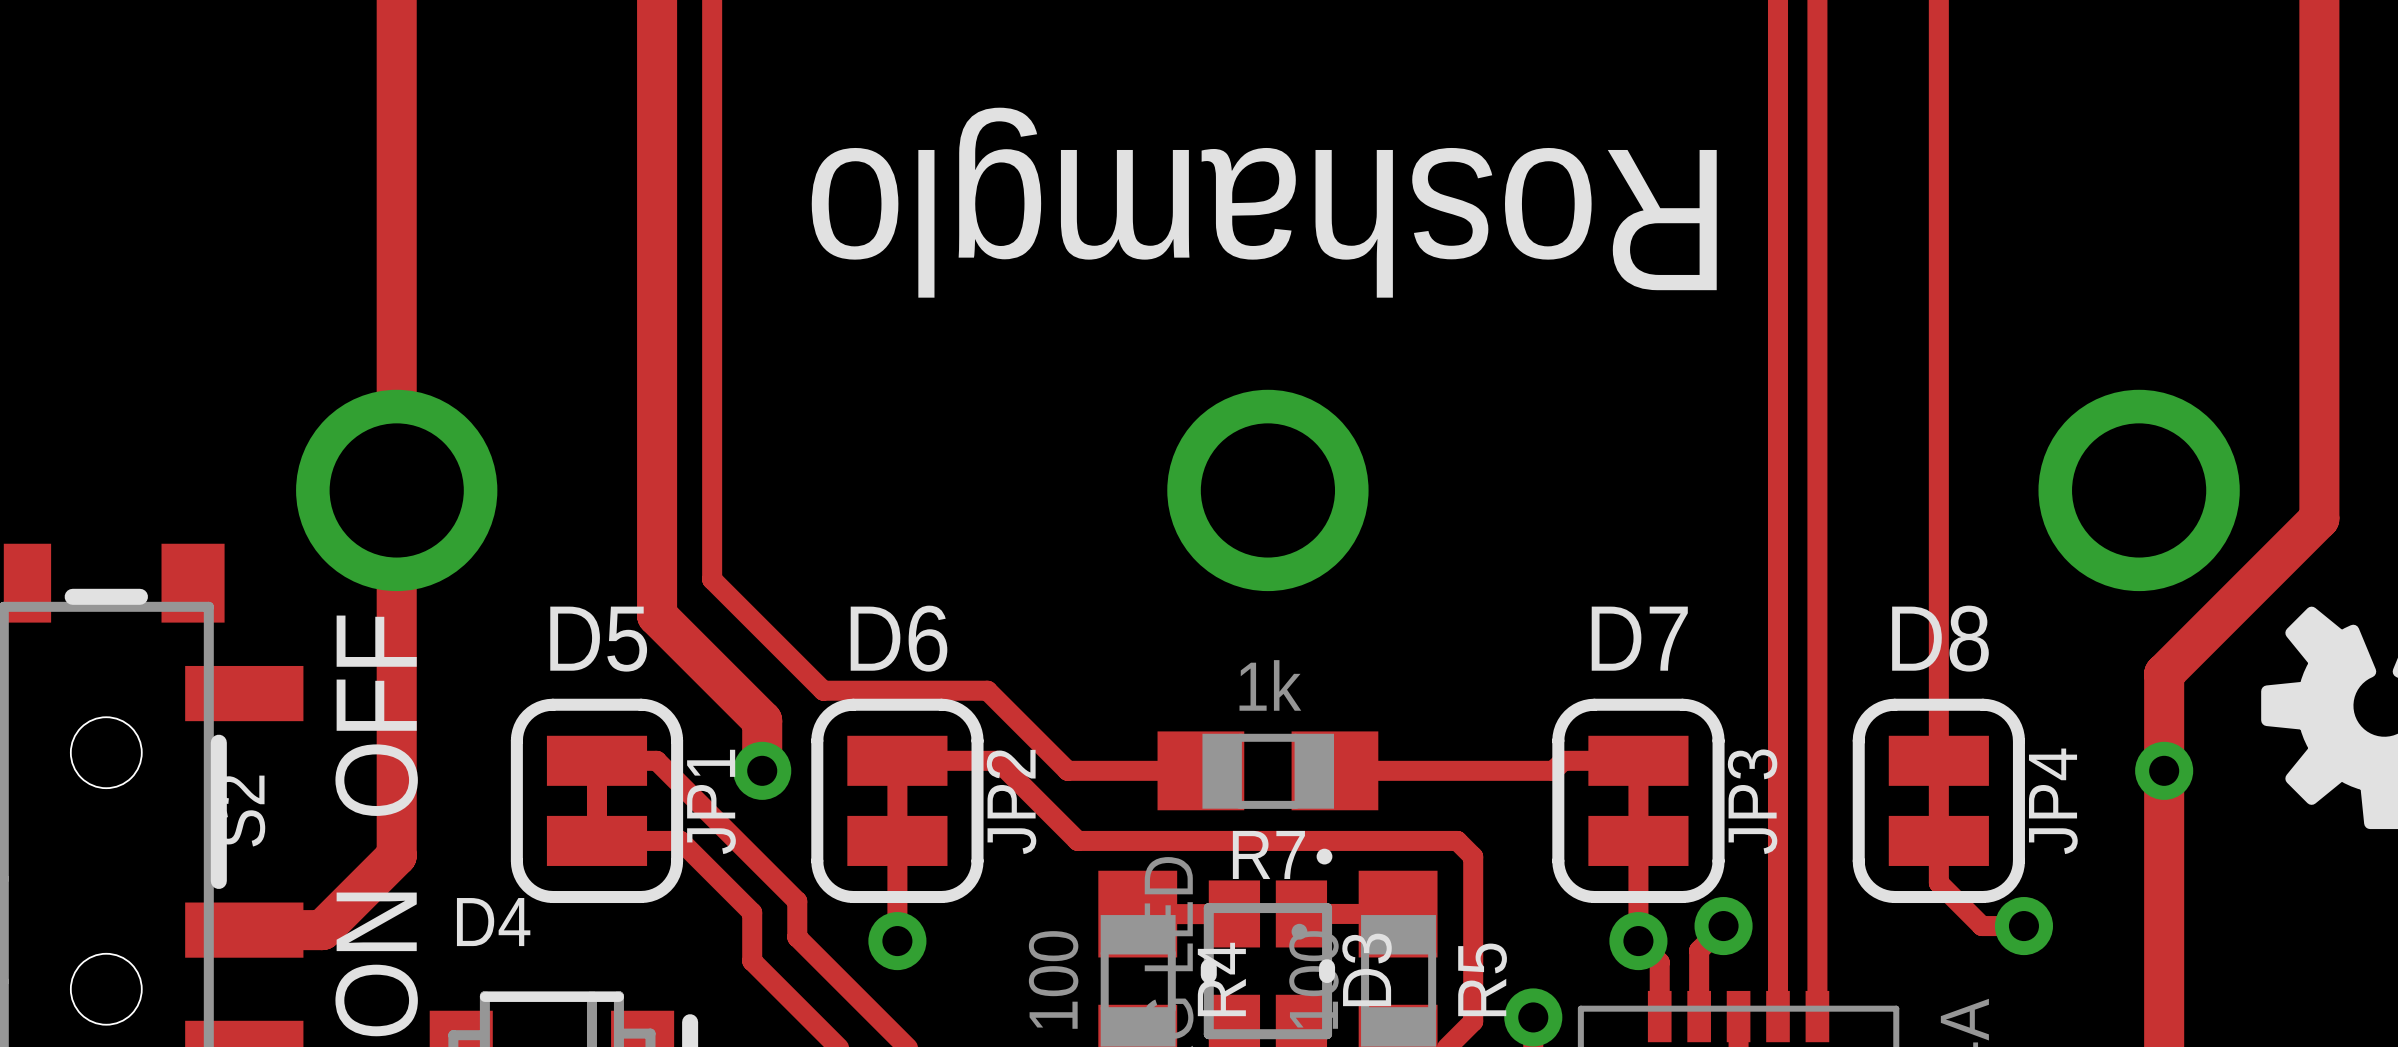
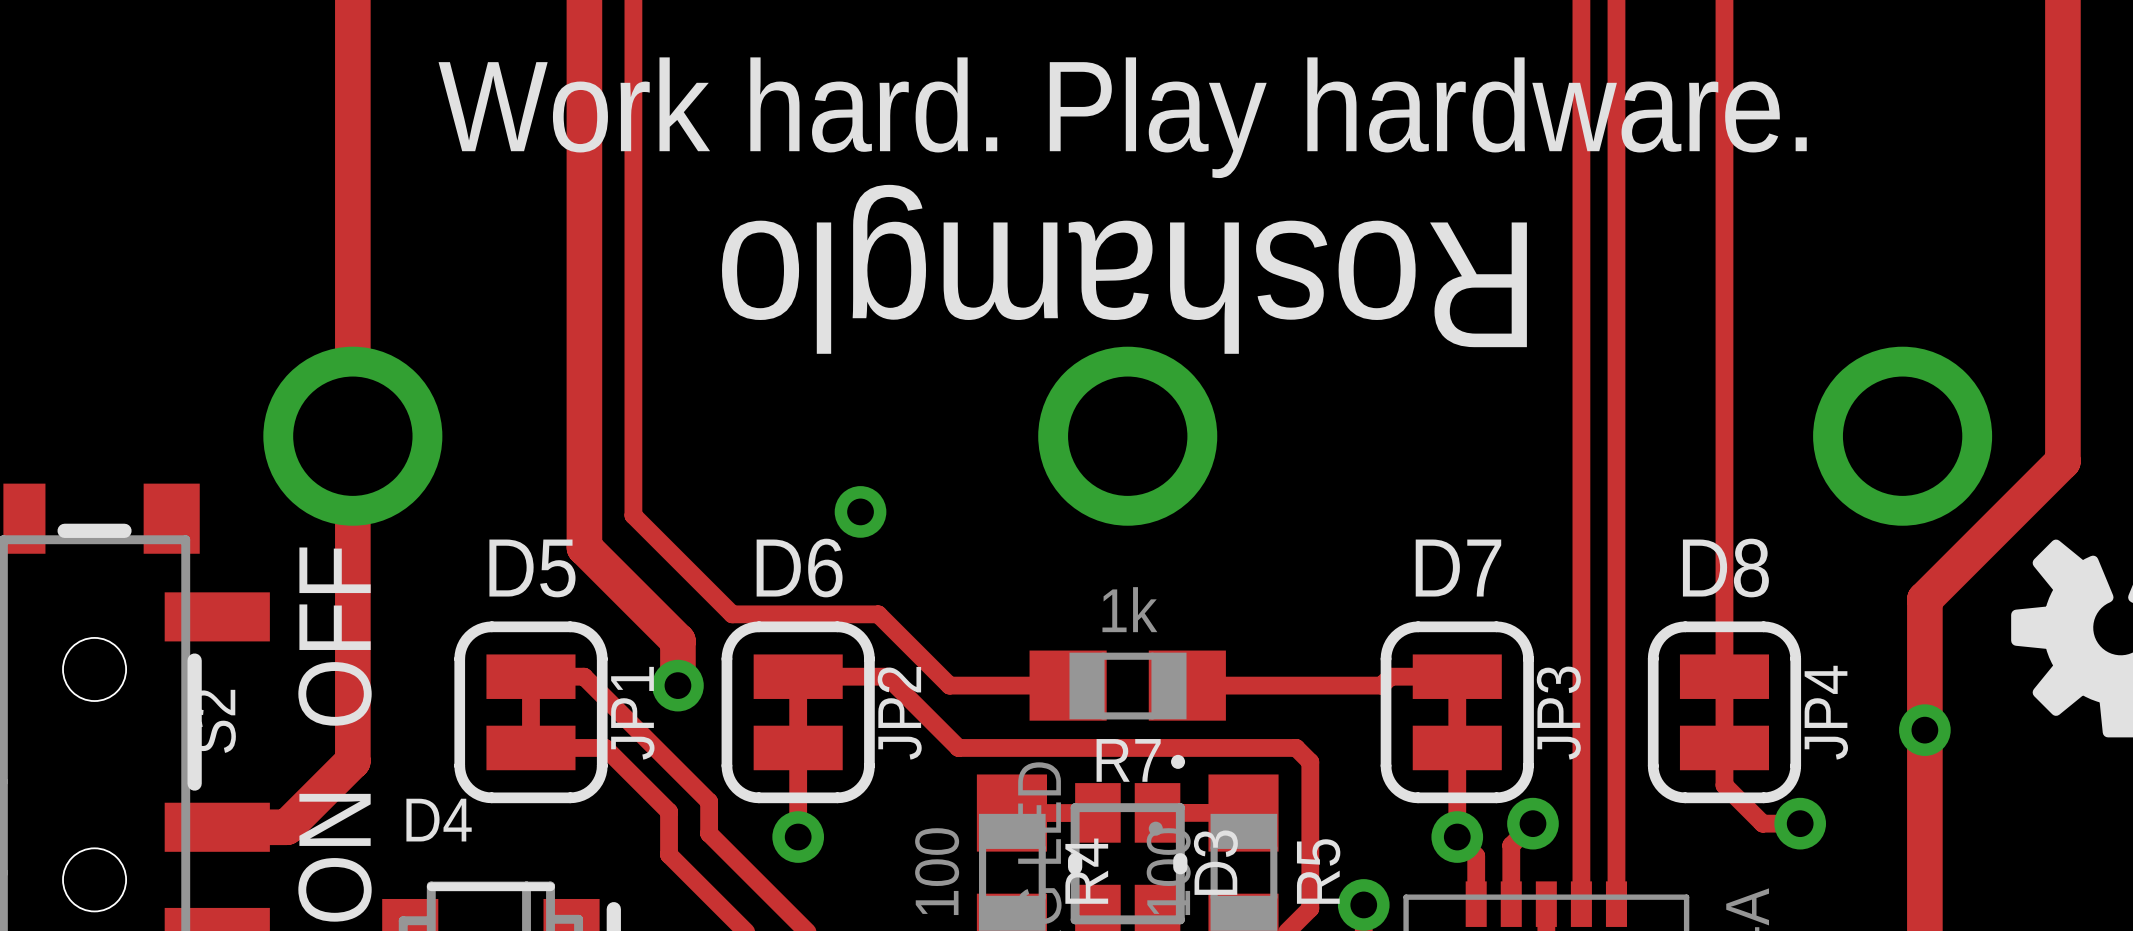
text: none -> Work hard. Play hardware. (1122, 117)
text position: Roshamglo (1264, 202) -> Roshamglo (1124, 269)
via: none -> (860, 511)
via position: (2164, 770) -> (1924, 730)

